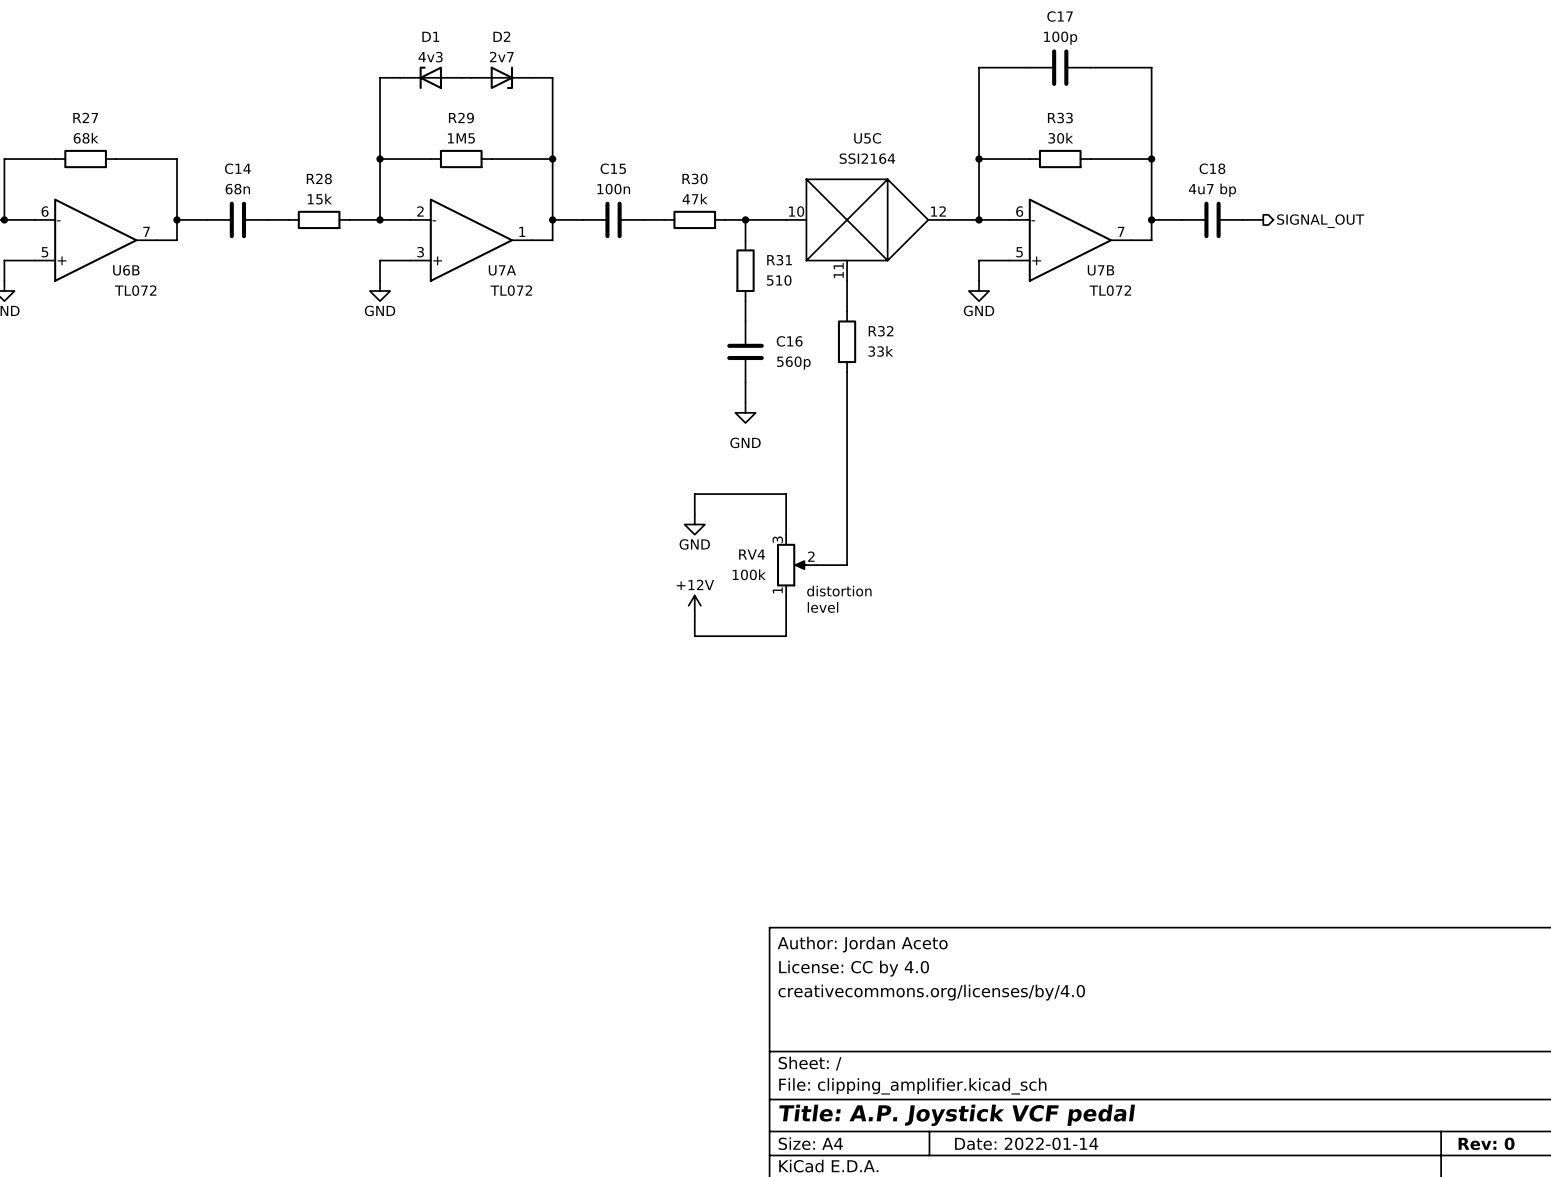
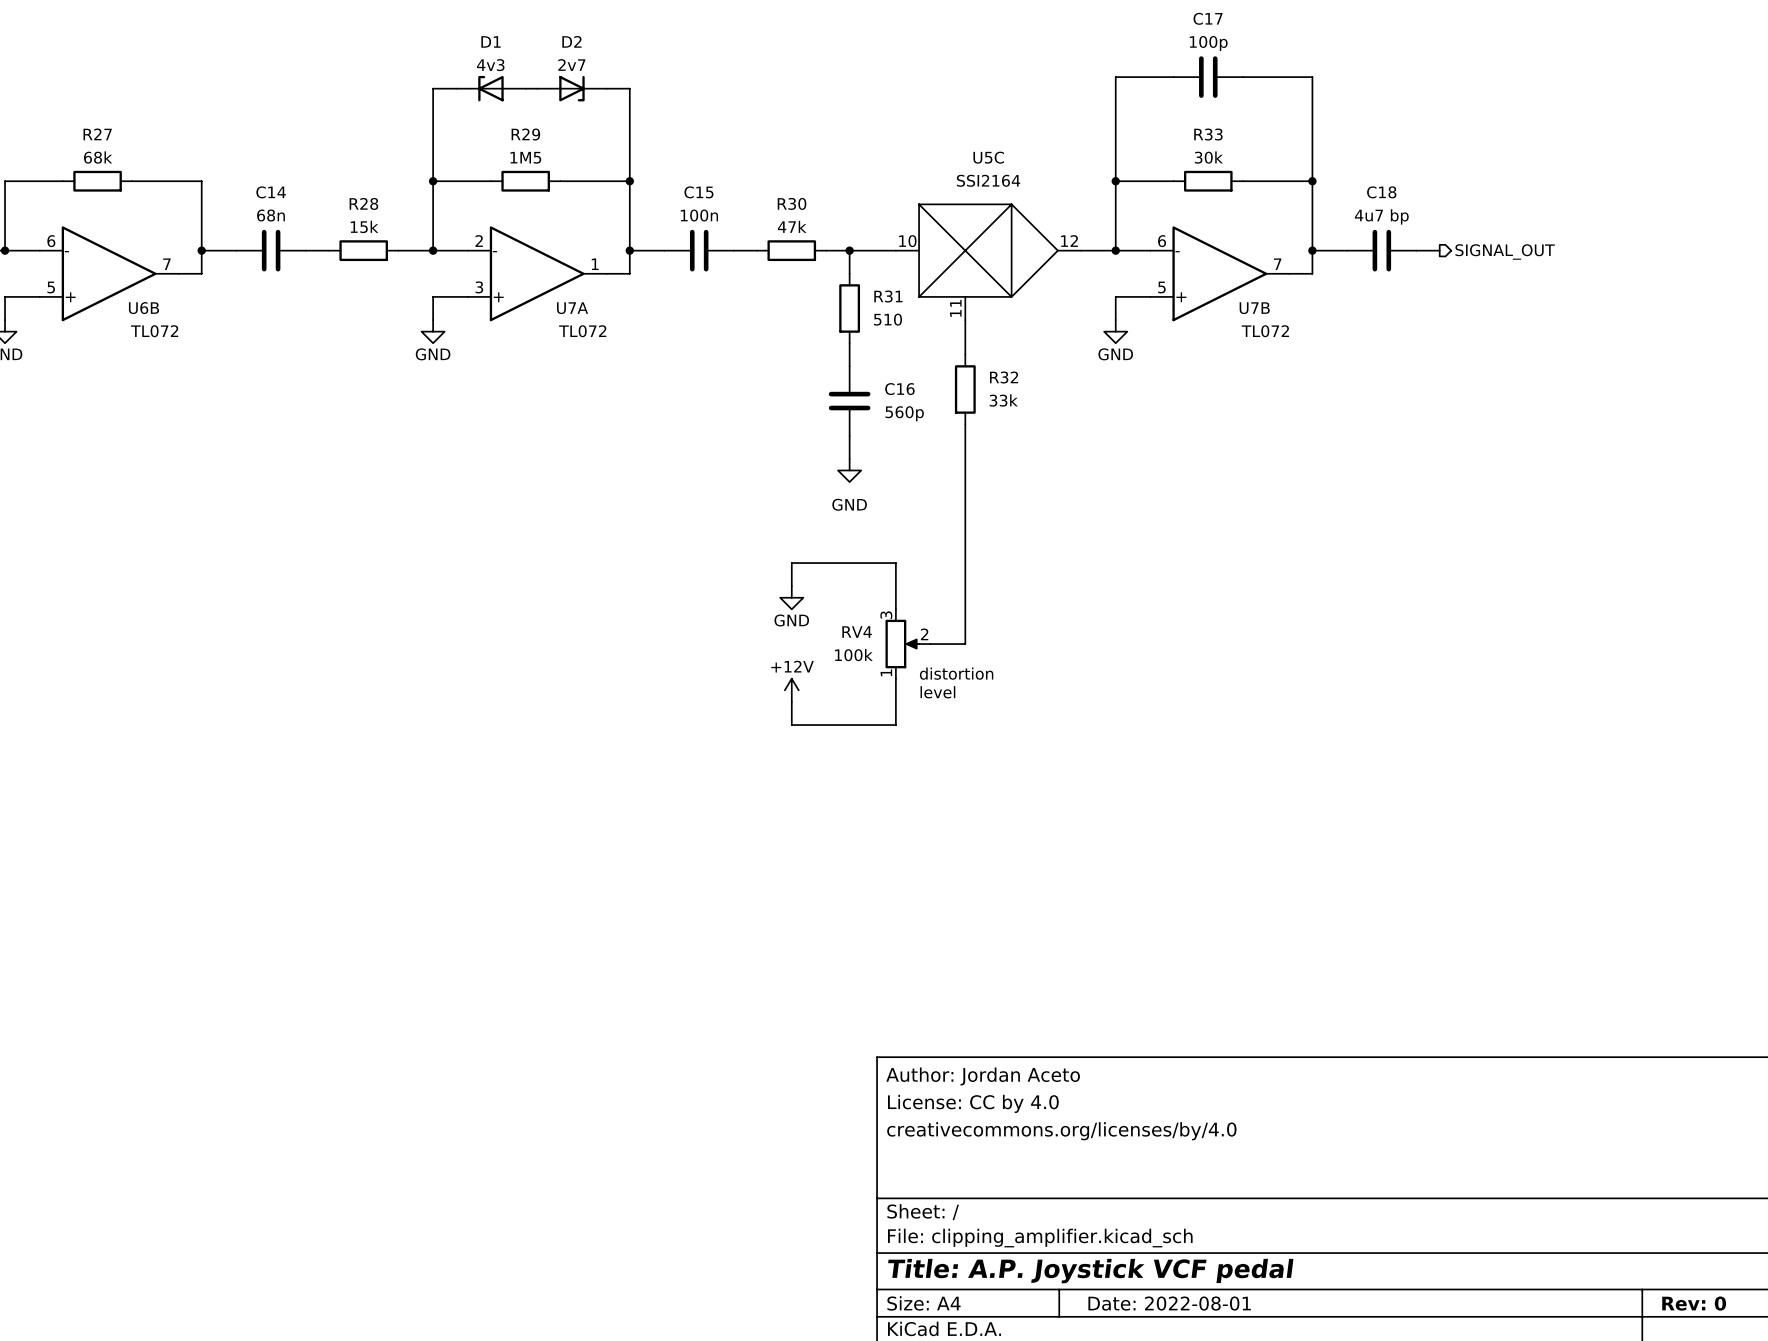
title block: Date: 2022-01-14 (1026, 1143) -> Date: 2022-08-01 (1169, 1303)

